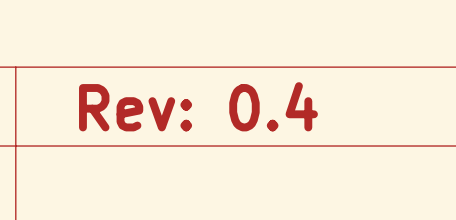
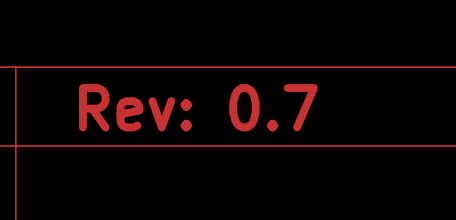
title block: Rev: 0.4 (198, 106) -> Rev: 0.7 (198, 107)

